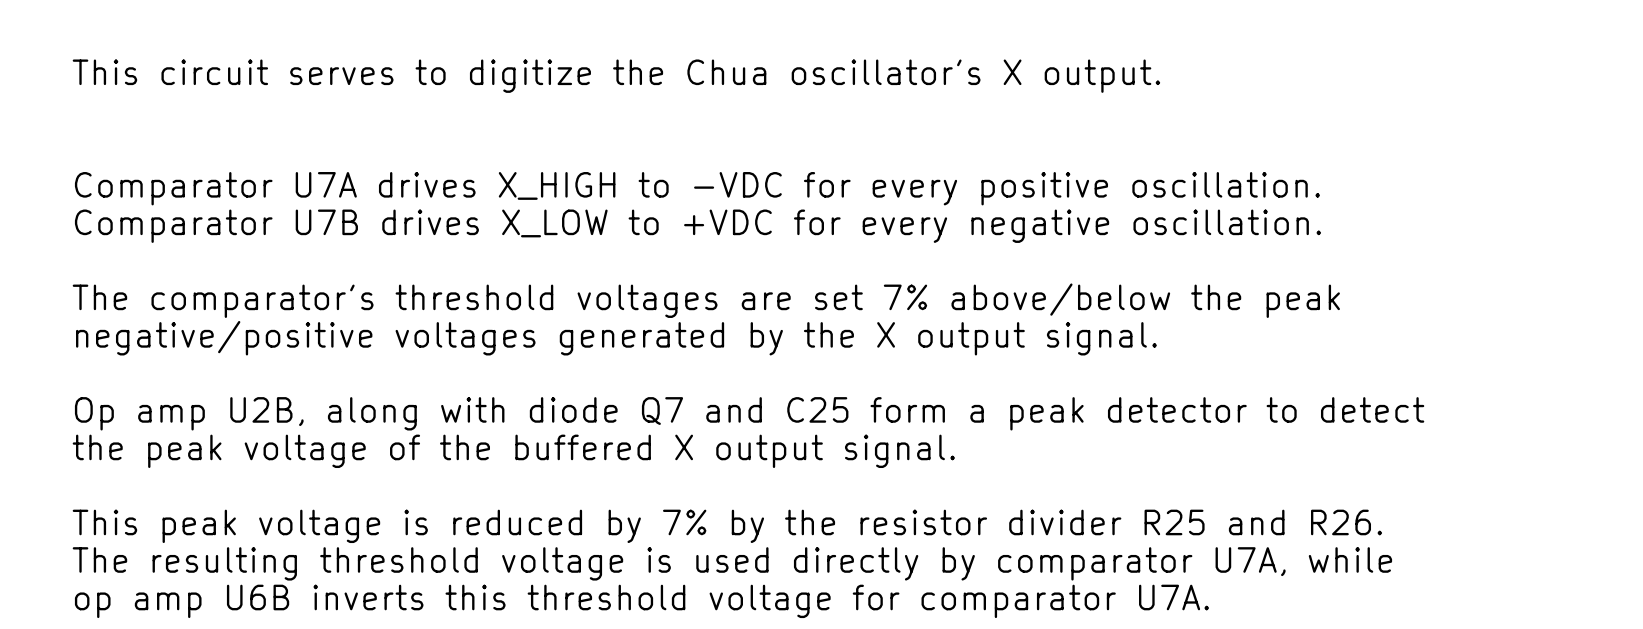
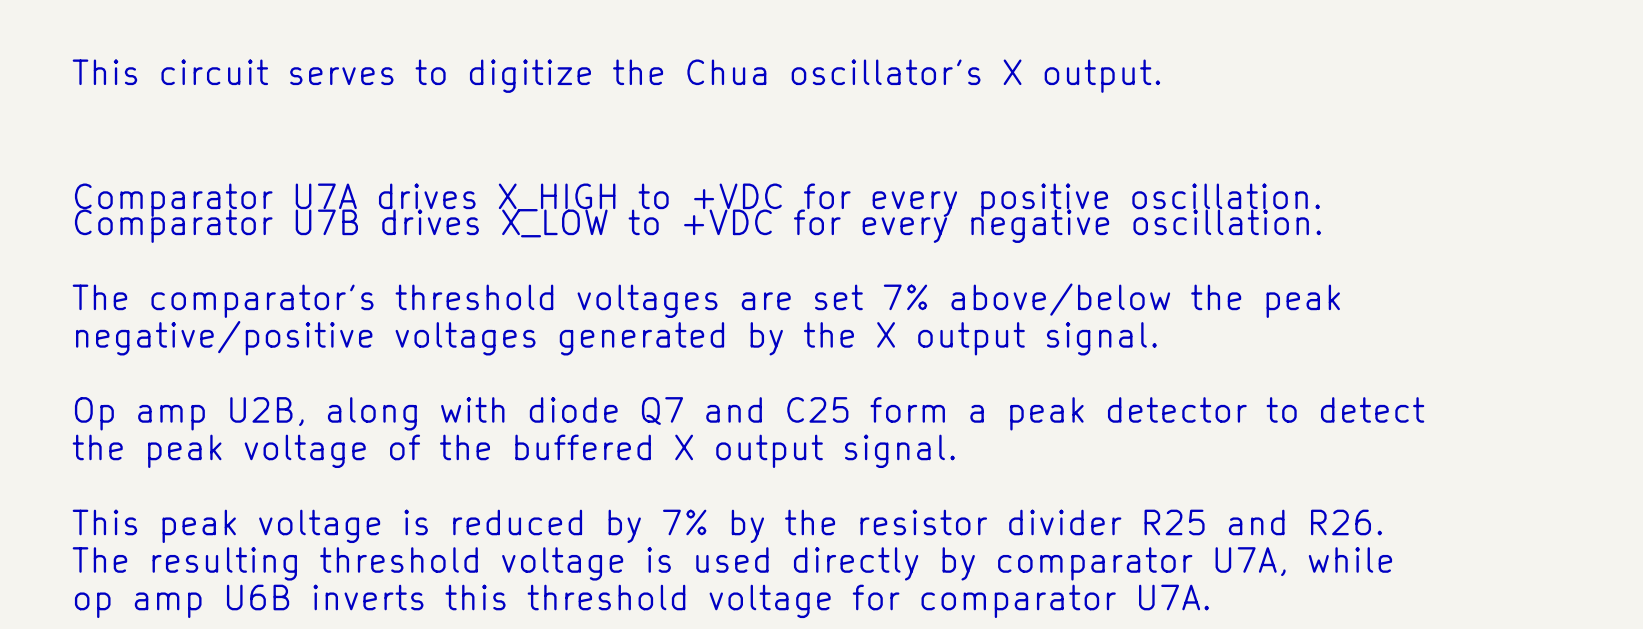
text: Comparator U7A drives X_HIGH to -VDC for every positive oscillation. (697, 188) -> Comparator U7A drives X_HIGH to +VDC for every positive oscillation. (697, 200)

